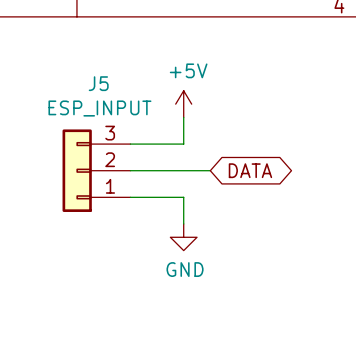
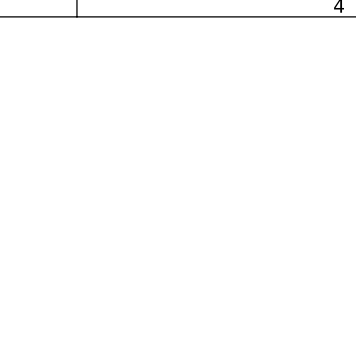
power symbol: +5V (183, 104) -> none
wire: (183, 117) (183, 144) (130, 144) -> none
J5: ESP_INPUT (96, 170) -> none
wire: (130, 170) (210, 170) -> none
global label: DATA (250, 170) -> none
wire: (130, 197) (183, 197) (183, 223) -> none
power symbol: GND (183, 237) -> none

